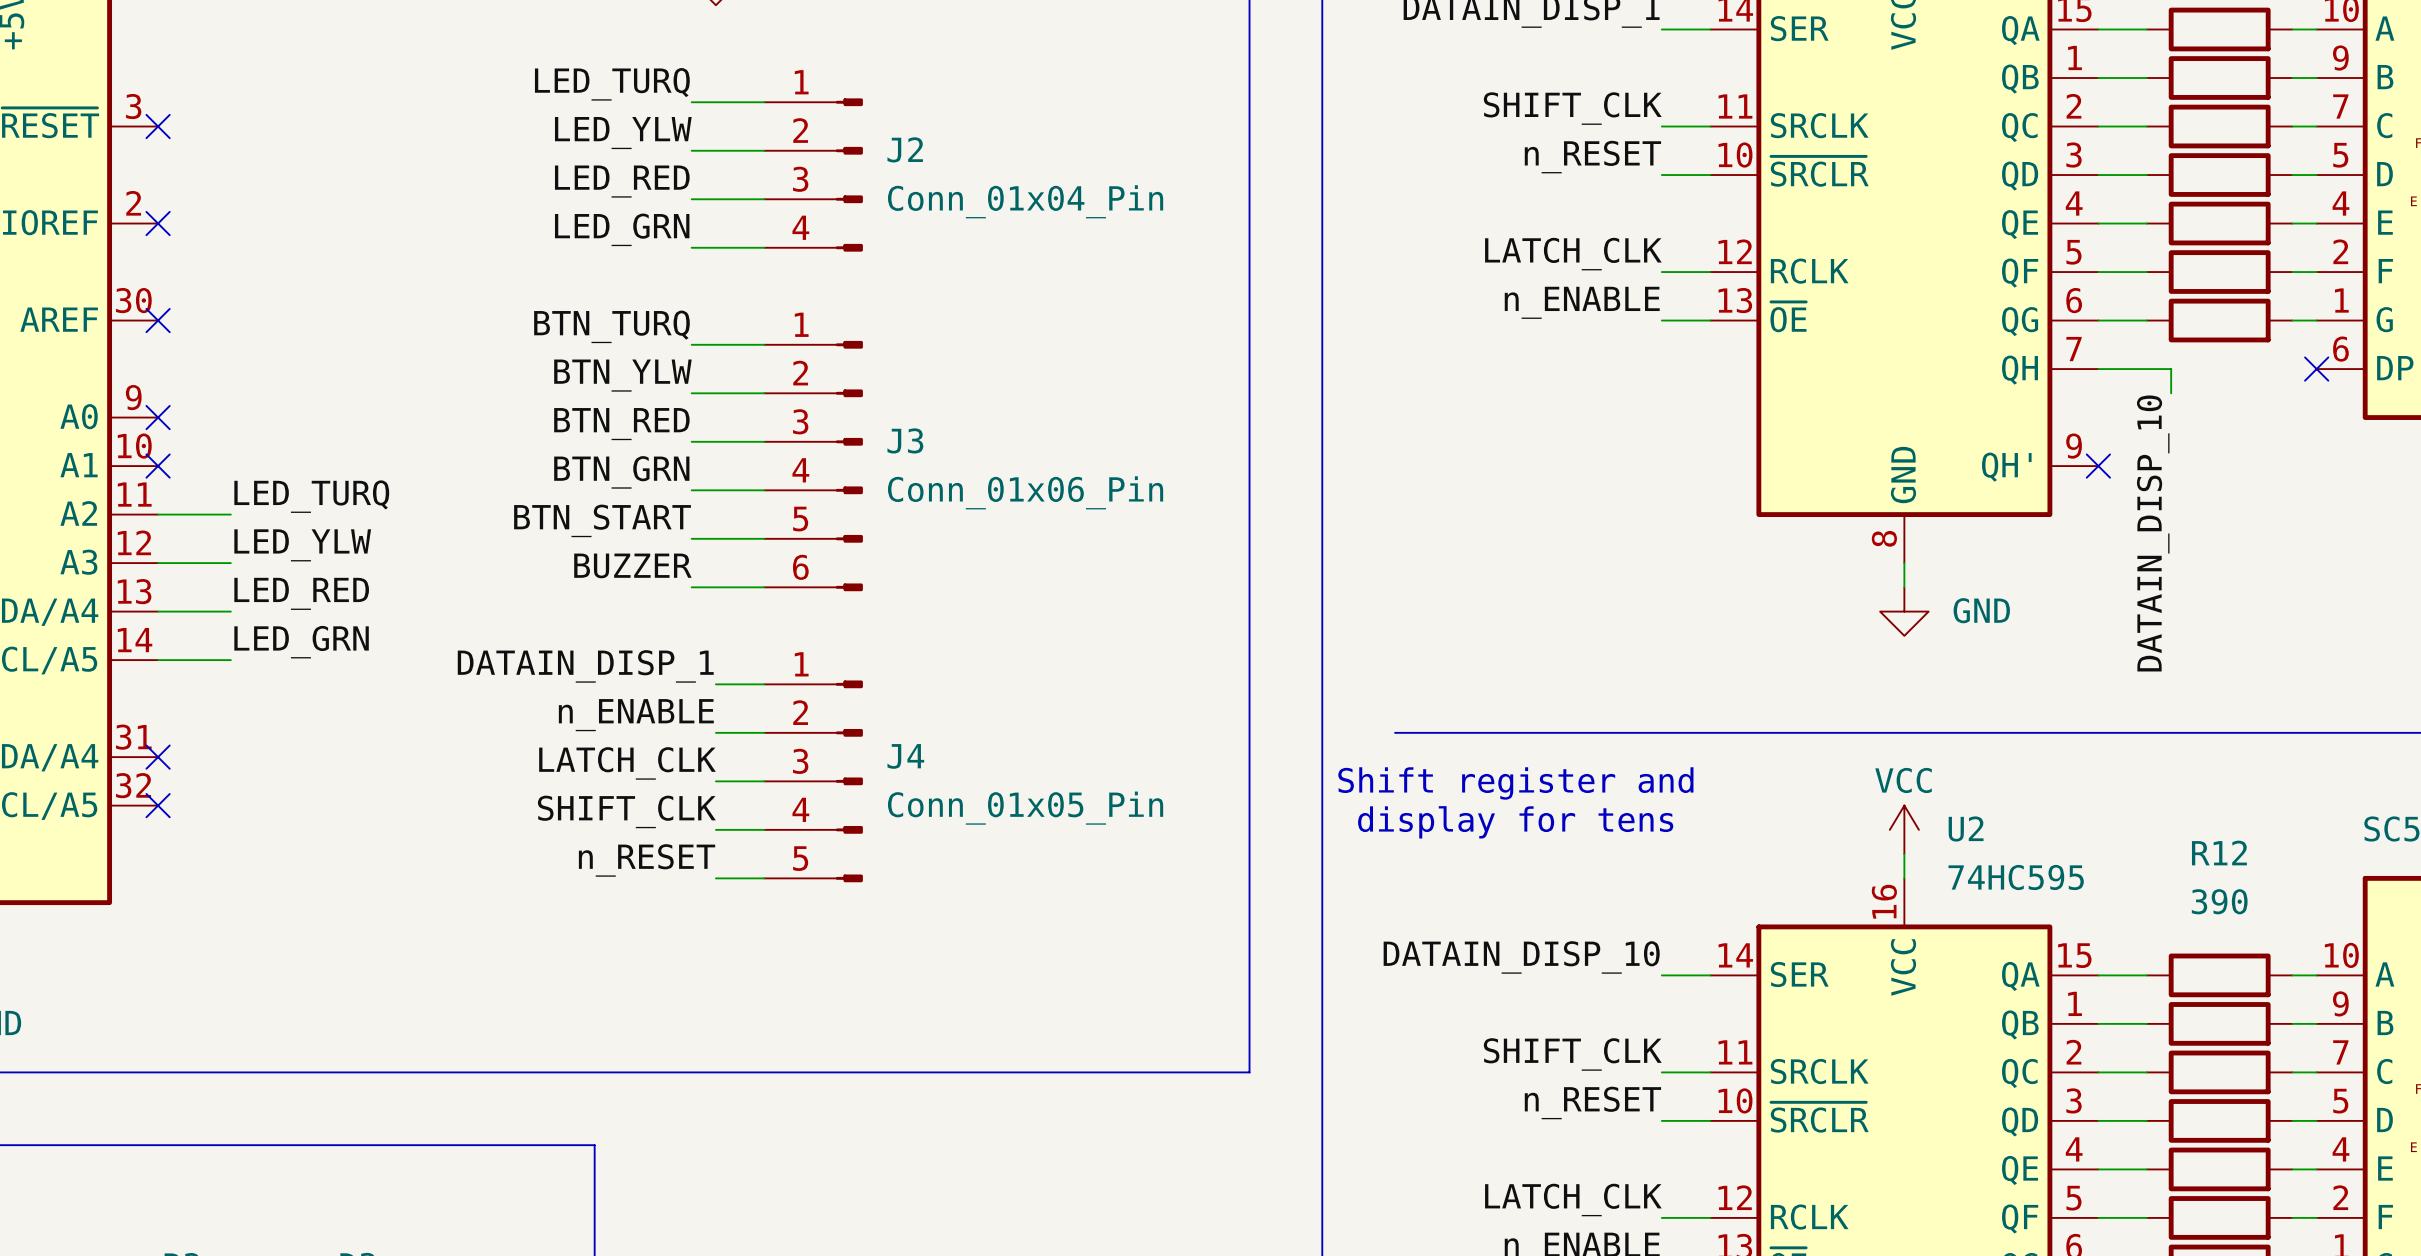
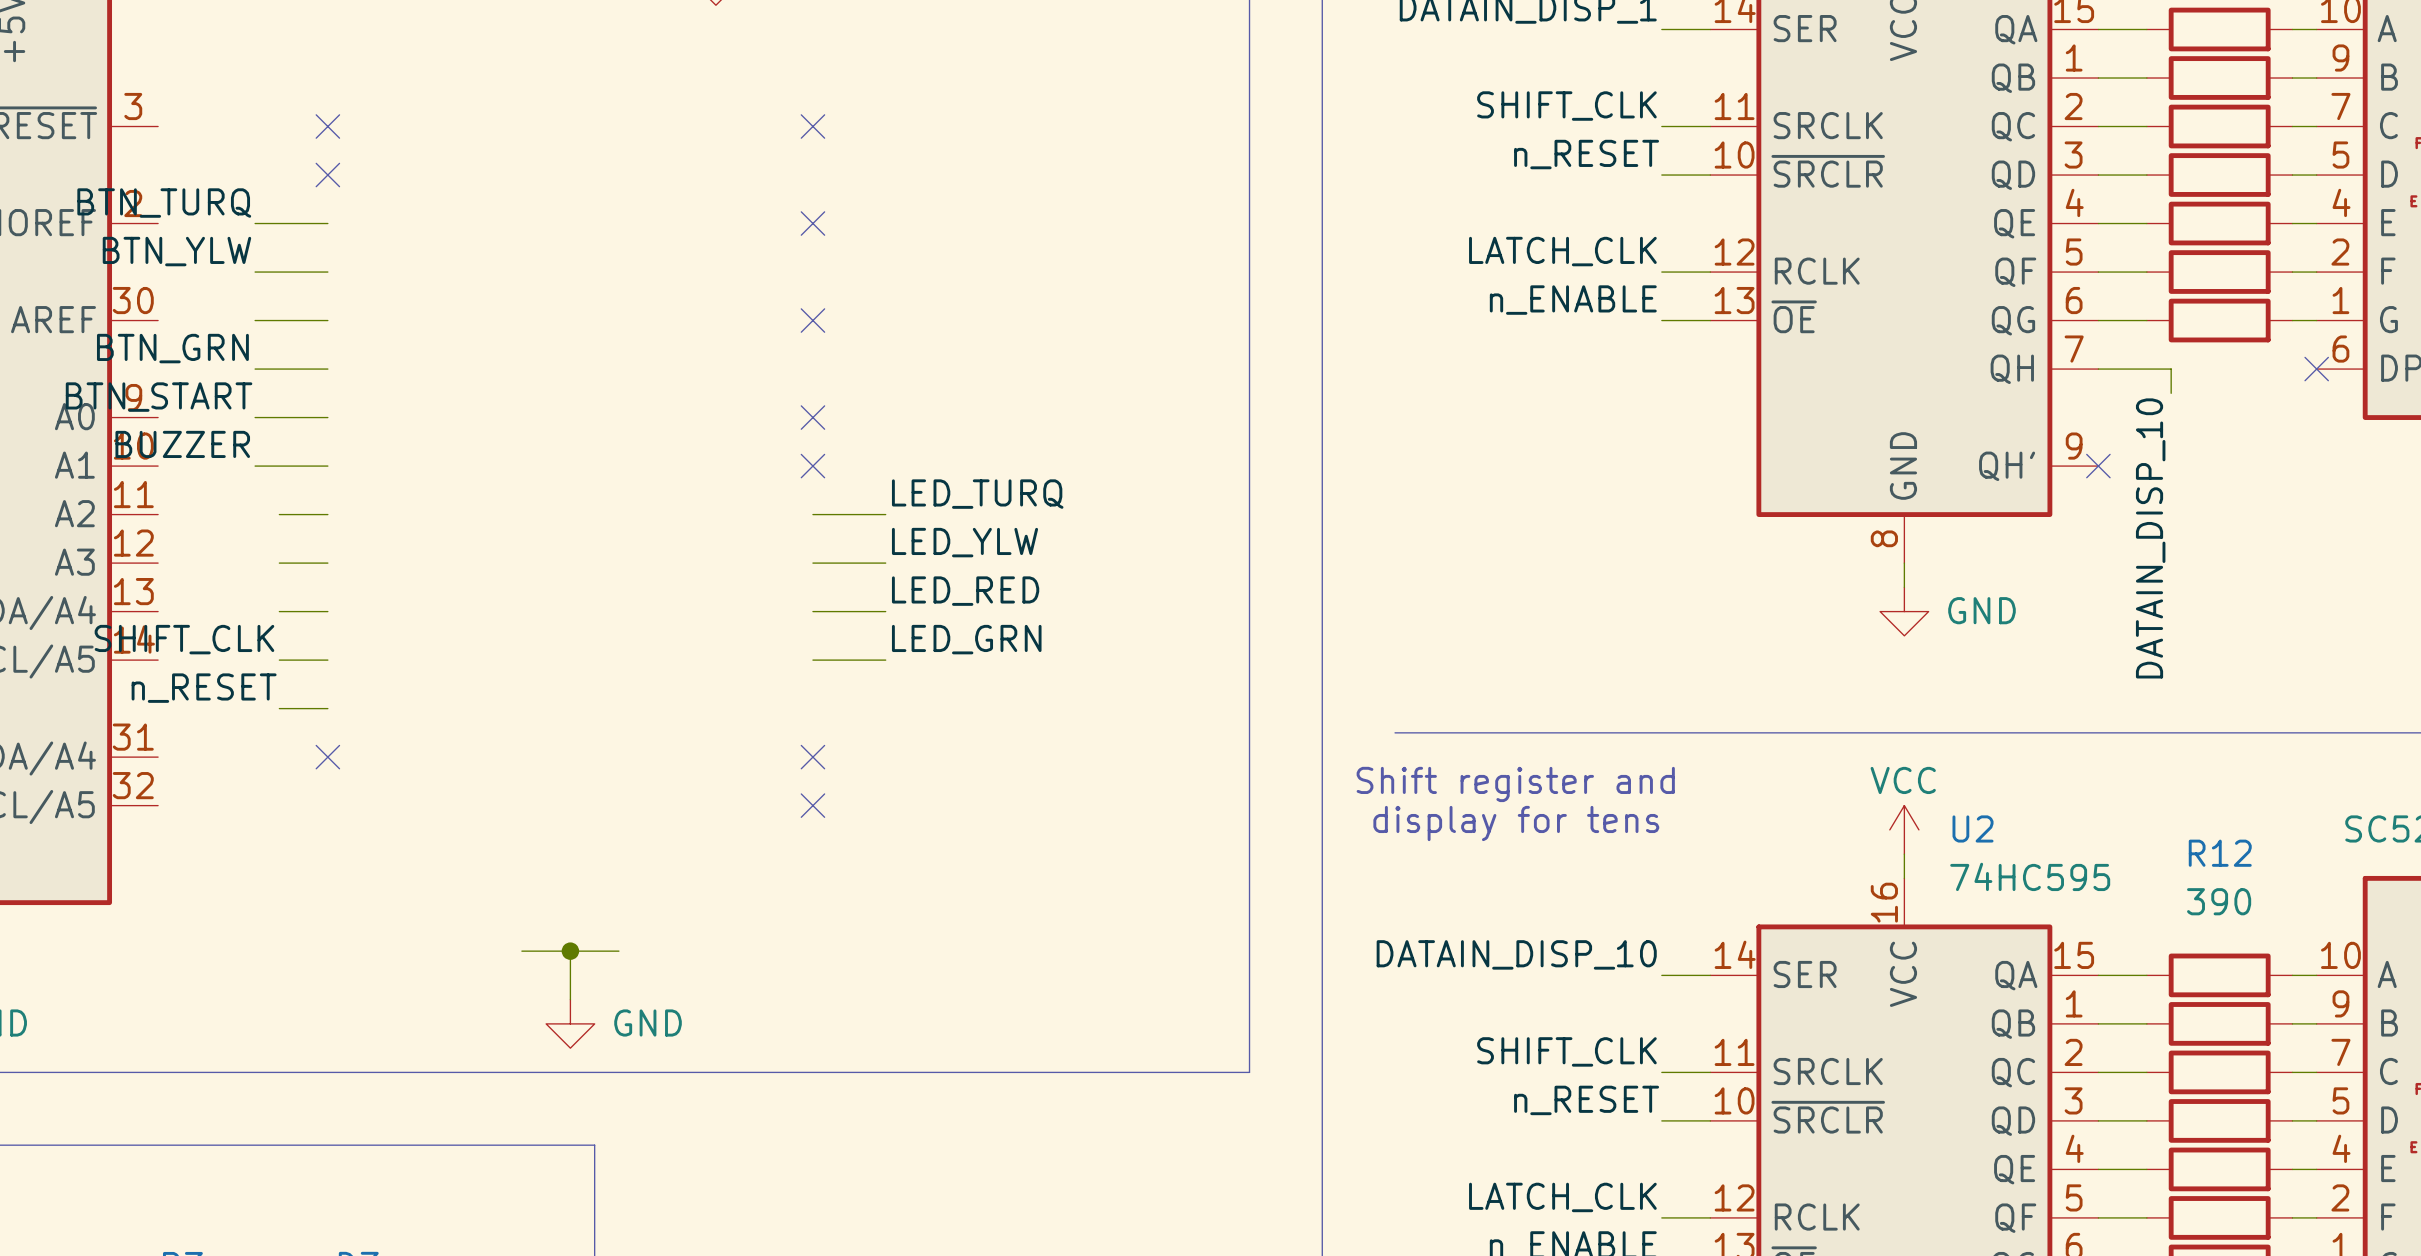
label: LED_TURQ (612, 84) -> none
wire: (691, 102) (764, 102) -> (812, 514) (885, 514)
no-connect mark: (158, 126) -> none
no-connect mark: none -> (327, 126)
no-connect mark: none -> (812, 126)
label: LED_YLW (623, 133) -> none
wire: (691, 150) (764, 150) -> (812, 563) (885, 563)
no-connect mark: none -> (327, 175)
J2: Conn_01x04_Pin (813, 175) -> none
label: LED_RED (622, 181) -> none
wire: (691, 199) (764, 199) -> (812, 611) (885, 611)
label: none -> BTN_TURQ (164, 203)
no-connect mark: (158, 223) -> none
no-connect mark: none -> (812, 223)
label: LED_GRN (622, 229) -> none
wire: (691, 247) (764, 247) -> (812, 660) (885, 660)
label: none -> BTN_YLW (176, 251)
no-connect mark: (158, 320) -> none
no-connect mark: none -> (812, 320)
label: BTN_TURQ (611, 326) -> none
wire: (691, 344) (764, 344) -> (255, 223) (327, 223)
label: none -> BTN_GRN (172, 348)
label: BTN_YLW (622, 375) -> none
wire: (691, 393) (764, 393) -> (255, 272) (327, 272)
label: none -> BTN_START (159, 397)
no-connect mark: (158, 417) -> none
no-connect mark: none -> (812, 417)
label: BTN_RED (621, 424) -> none
wire: (691, 441) (764, 441) -> (255, 320) (327, 320)
label: none -> BUZZER (182, 444)
no-connect mark: (158, 466) -> none
no-connect mark: none -> (812, 466)
J3: Conn_01x06_Pin (813, 466) -> none
label: BTN_GRN (621, 472) -> none
wire: (691, 490) (764, 490) -> (255, 369) (327, 369)
label: LED_TURQ (311, 496) -> none
label: none -> LED_TURQ (977, 494)
wire: (158, 514) (230, 514) -> none
wire: none -> (279, 514) (327, 514)
label: BTN_START (602, 520) -> none
wire: (691, 538) (764, 538) -> (255, 417) (327, 417)
label: LED_YLW (302, 545) -> none
label: none -> LED_YLW (965, 542)
wire: (158, 563) (230, 563) -> none
label: BUZZER (632, 565) -> none
wire: (691, 587) (764, 587) -> (255, 466) (327, 466)
label: LED_RED (301, 593) -> none
label: none -> LED_RED (965, 591)
wire: (158, 611) (230, 611) -> none
label: none -> SHIFT_CLK (184, 639)
label: LED_GRN (301, 642) -> none
label: none -> LED_GRN (966, 639)
wire: (158, 660) (230, 660) -> none
label: DATAIN_DISP_1 (585, 666) -> none
wire: (715, 684) (764, 684) -> (279, 563) (327, 563)
label: none -> n_RESET (204, 688)
label: n_ENABLE (636, 715) -> none
wire: (715, 732) (764, 732) -> (279, 611) (327, 611)
no-connect mark: (158, 757) -> none
no-connect mark: none -> (327, 757)
no-connect mark: none -> (812, 757)
label: LATCH_CLK (627, 763) -> none
wire: (715, 781) (764, 781) -> (279, 660) (327, 660)
J4: Conn_01x05_Pin (813, 781) -> none
no-connect mark: (158, 805) -> none
no-connect mark: none -> (812, 805)
label: SHIFT_CLK (626, 811) -> none
wire: (715, 829) (764, 829) -> (279, 708) (327, 708)
label: n_RESET (647, 860) -> none
wire: (715, 878) (764, 878) -> none
wire: none -> (521, 951) (618, 951)
wire: none -> (570, 951) (570, 999)
junction: none -> (570, 951)
power symbol: none -> GND (570, 1023)

